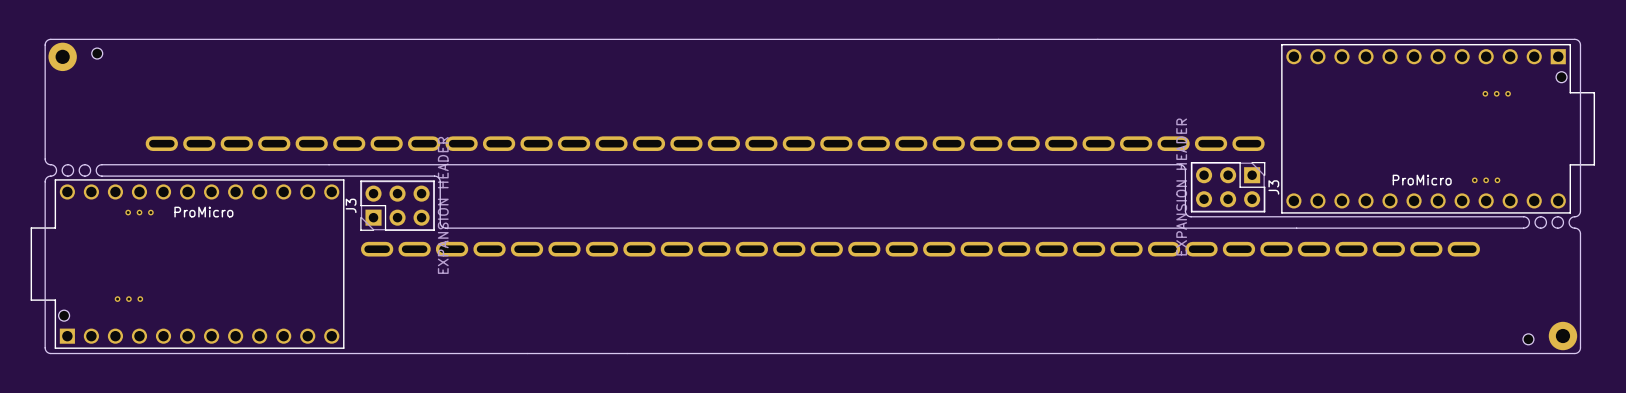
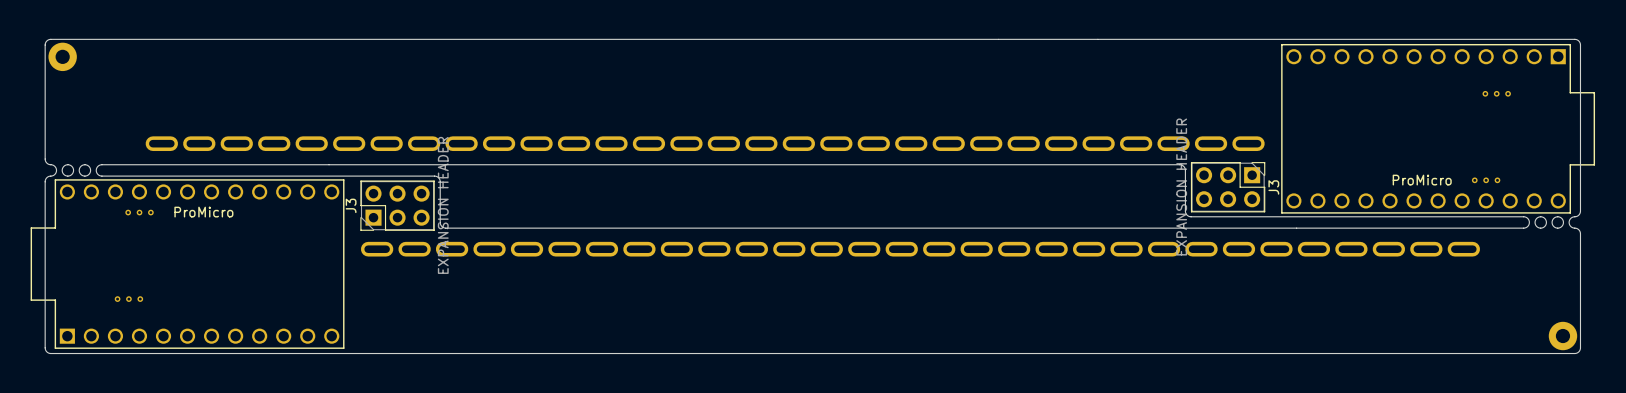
part: (97, 53) -> none
part: (1561, 77) -> none
part: (64, 315) -> none
part: (1528, 339) -> none

